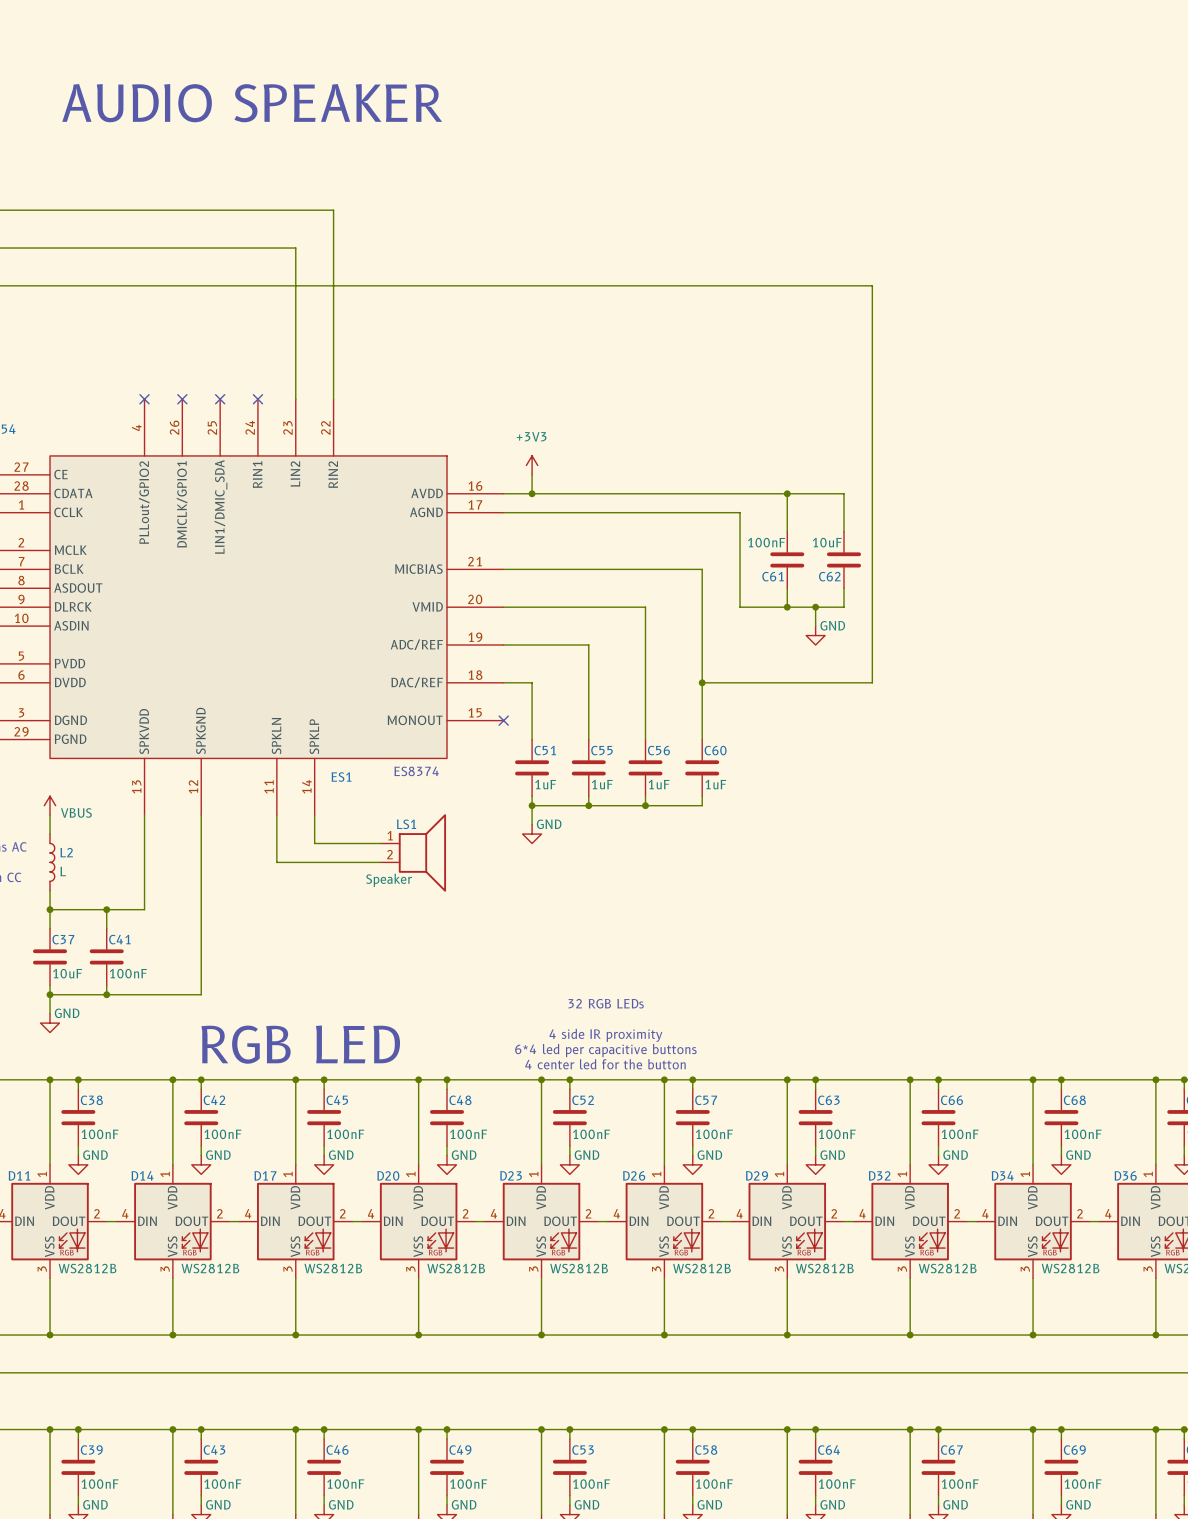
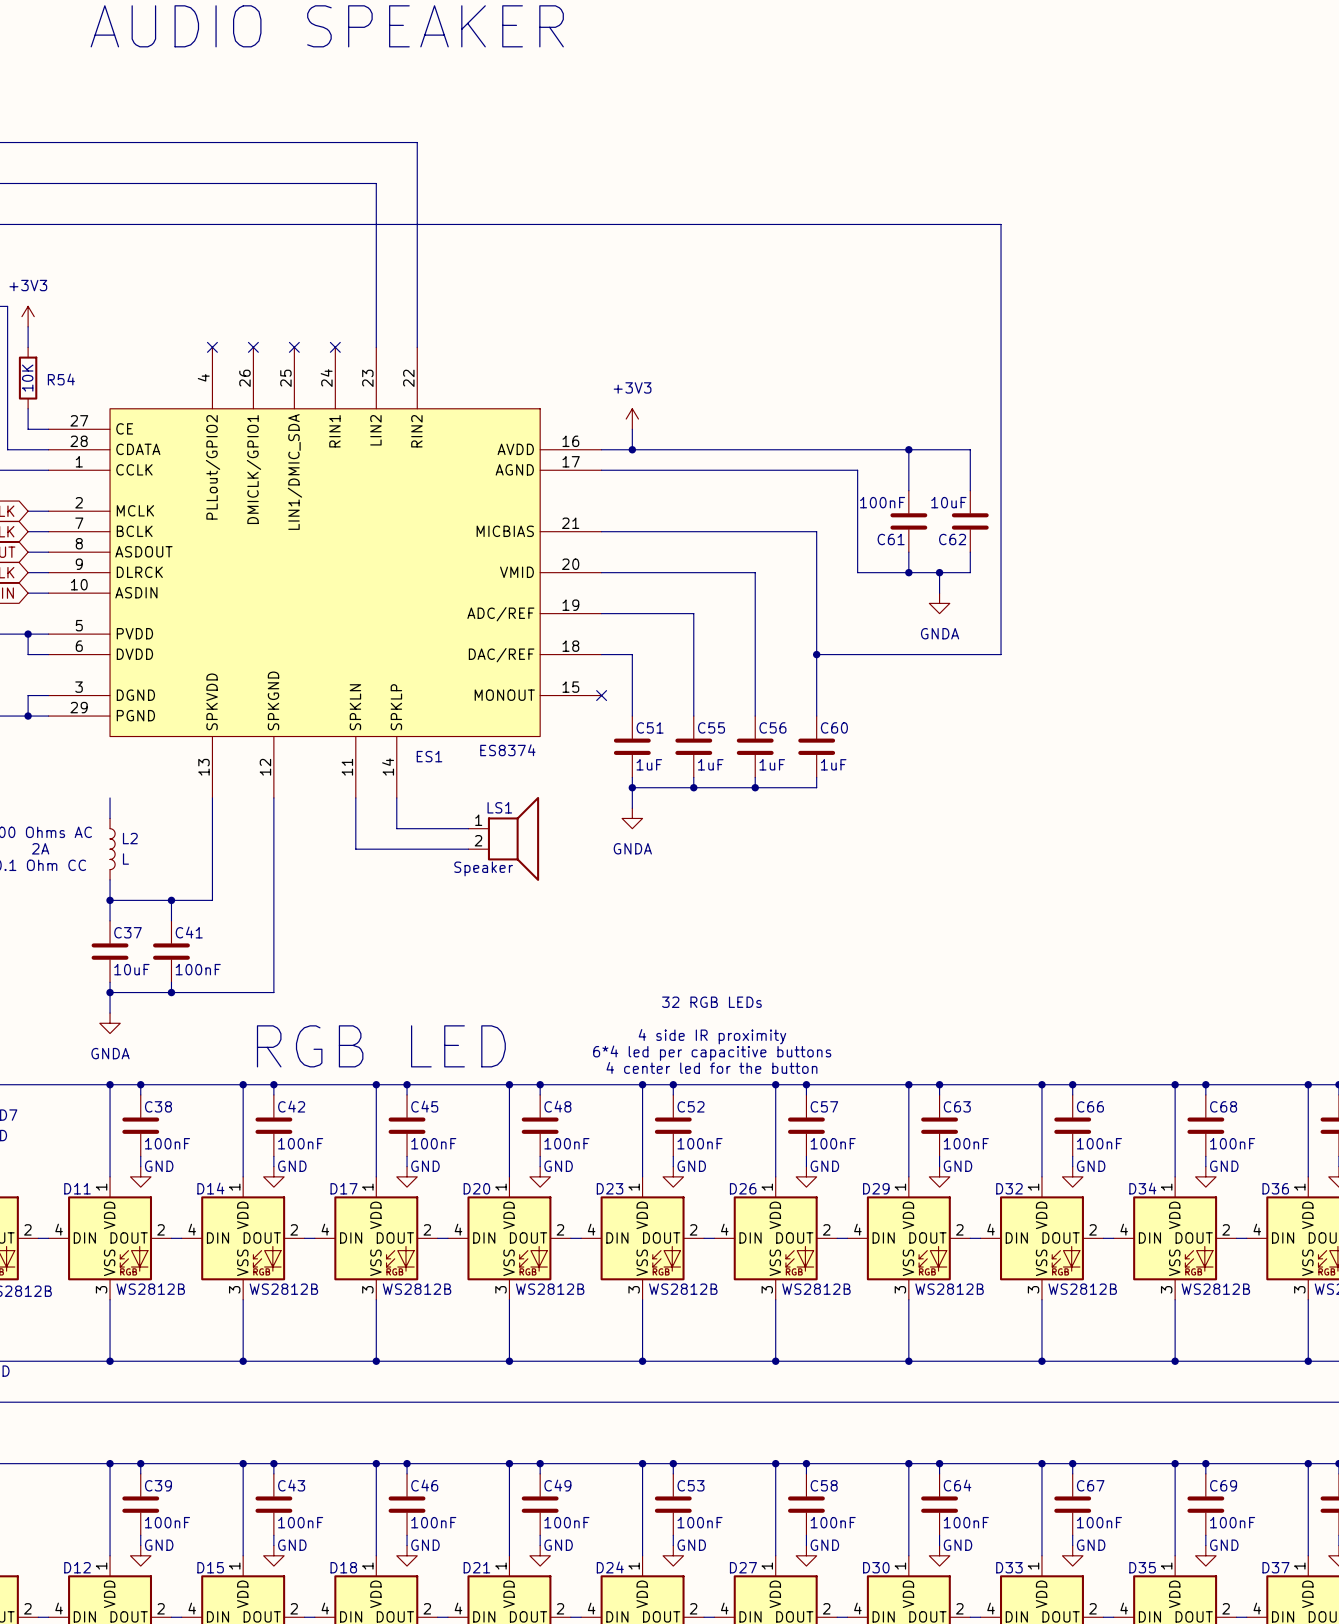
power symbol: GND (815, 635) -> GNDA (939, 603)
power symbol: VBUS (50, 805) -> none
power symbol: GND (532, 834) -> GNDA (632, 818)
power symbol: GND (50, 1023) -> GNDA (110, 1023)

